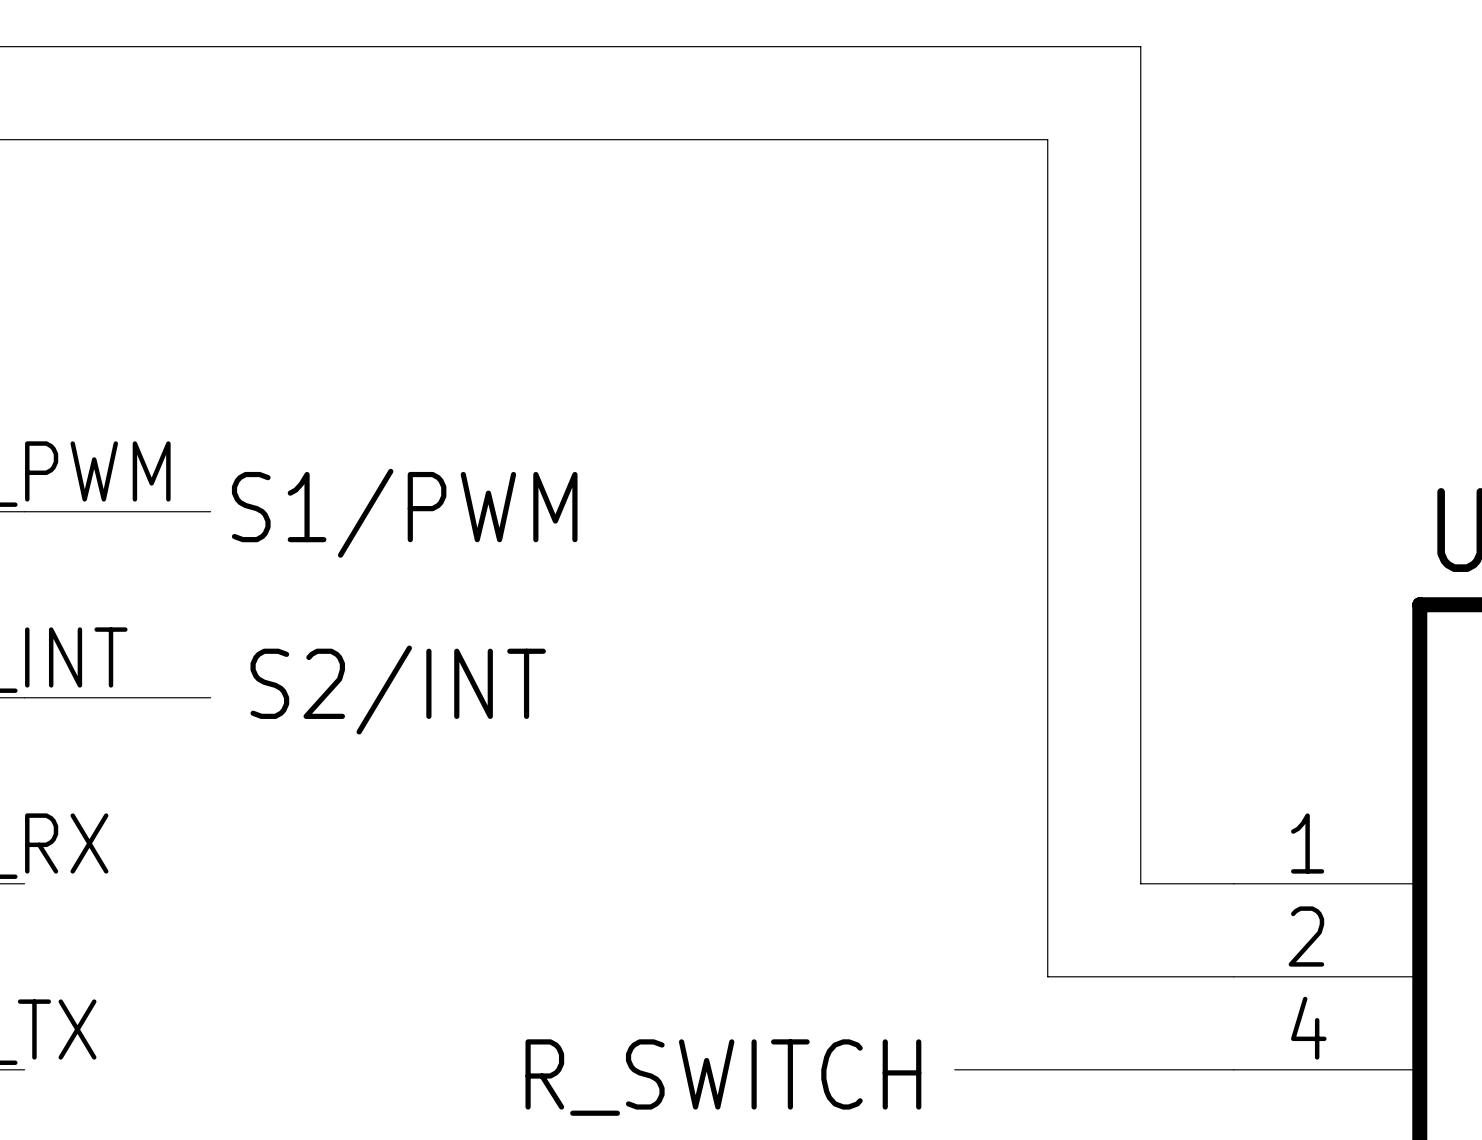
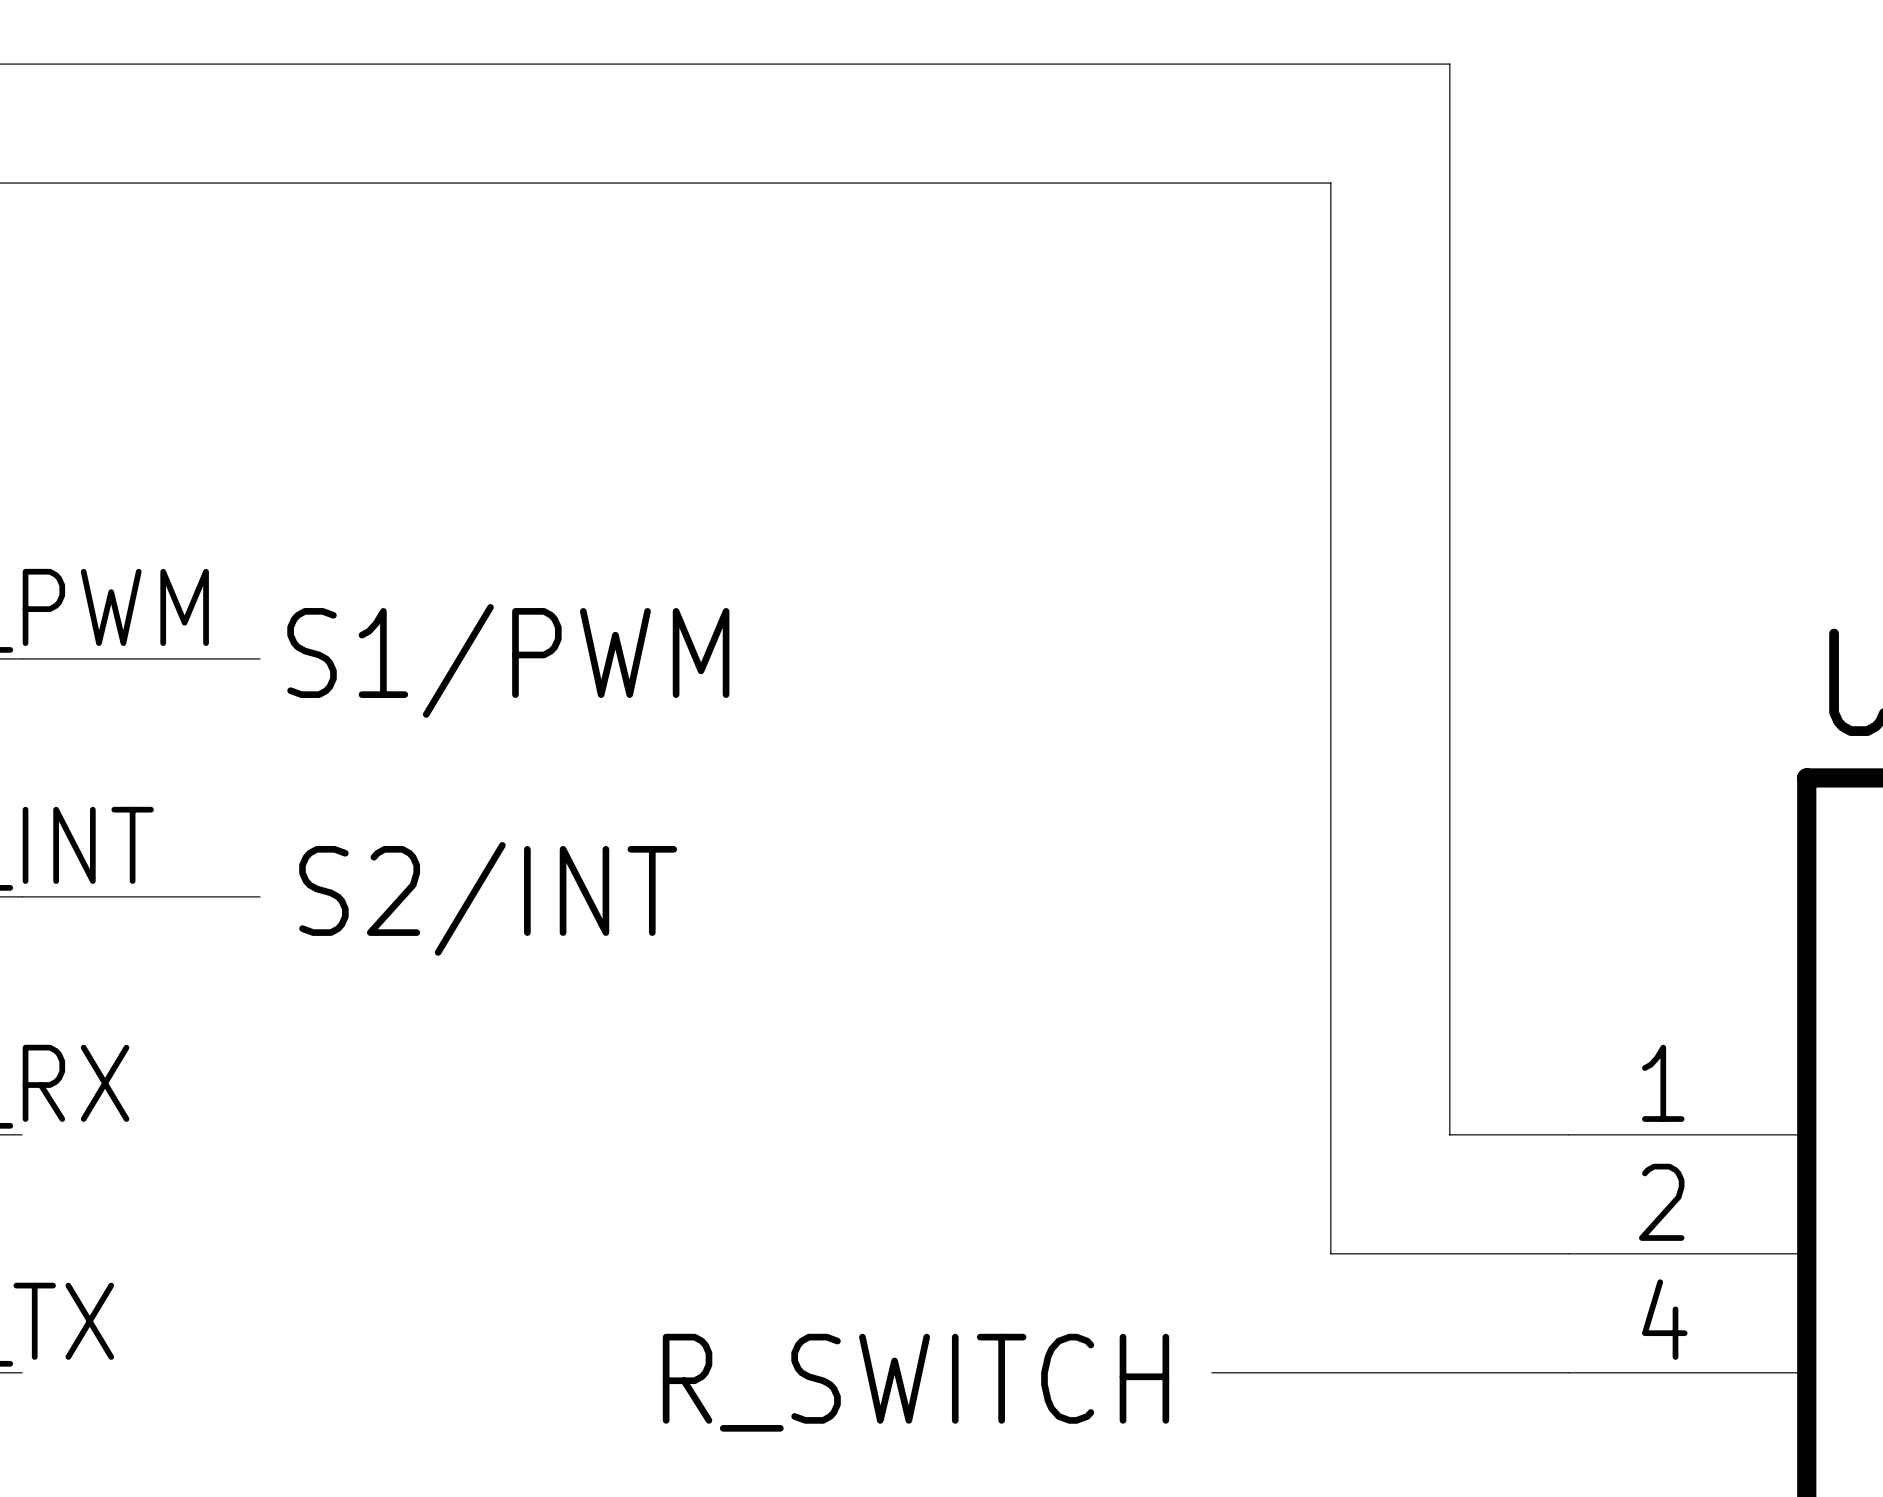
label position: S2/INT (398, 690) -> S2/INT (488, 898)

